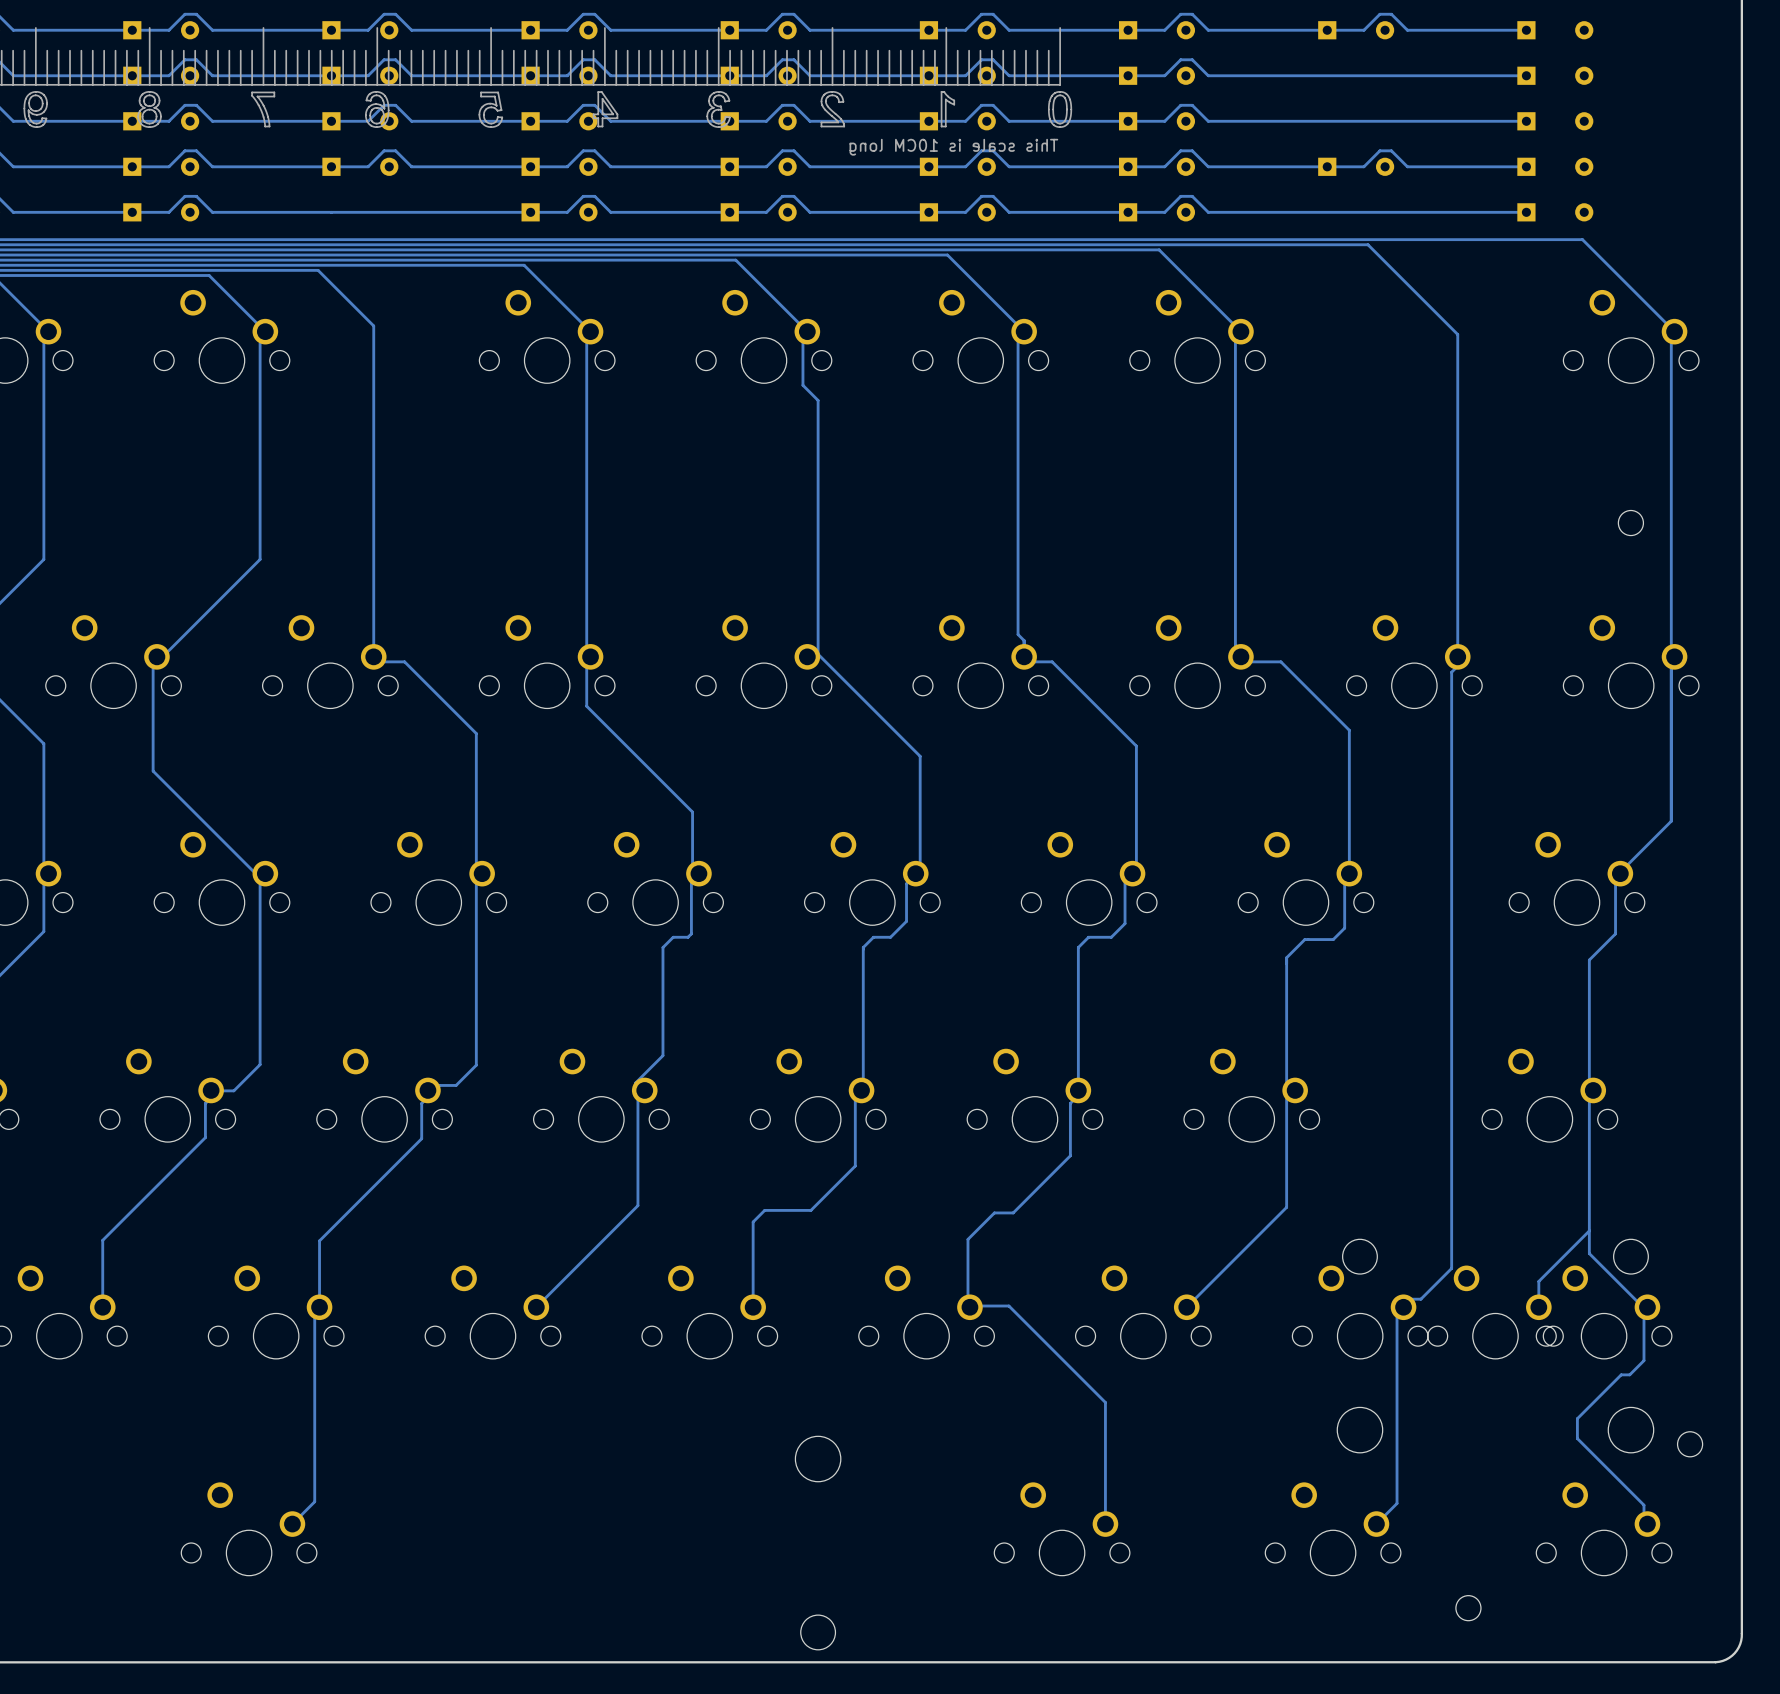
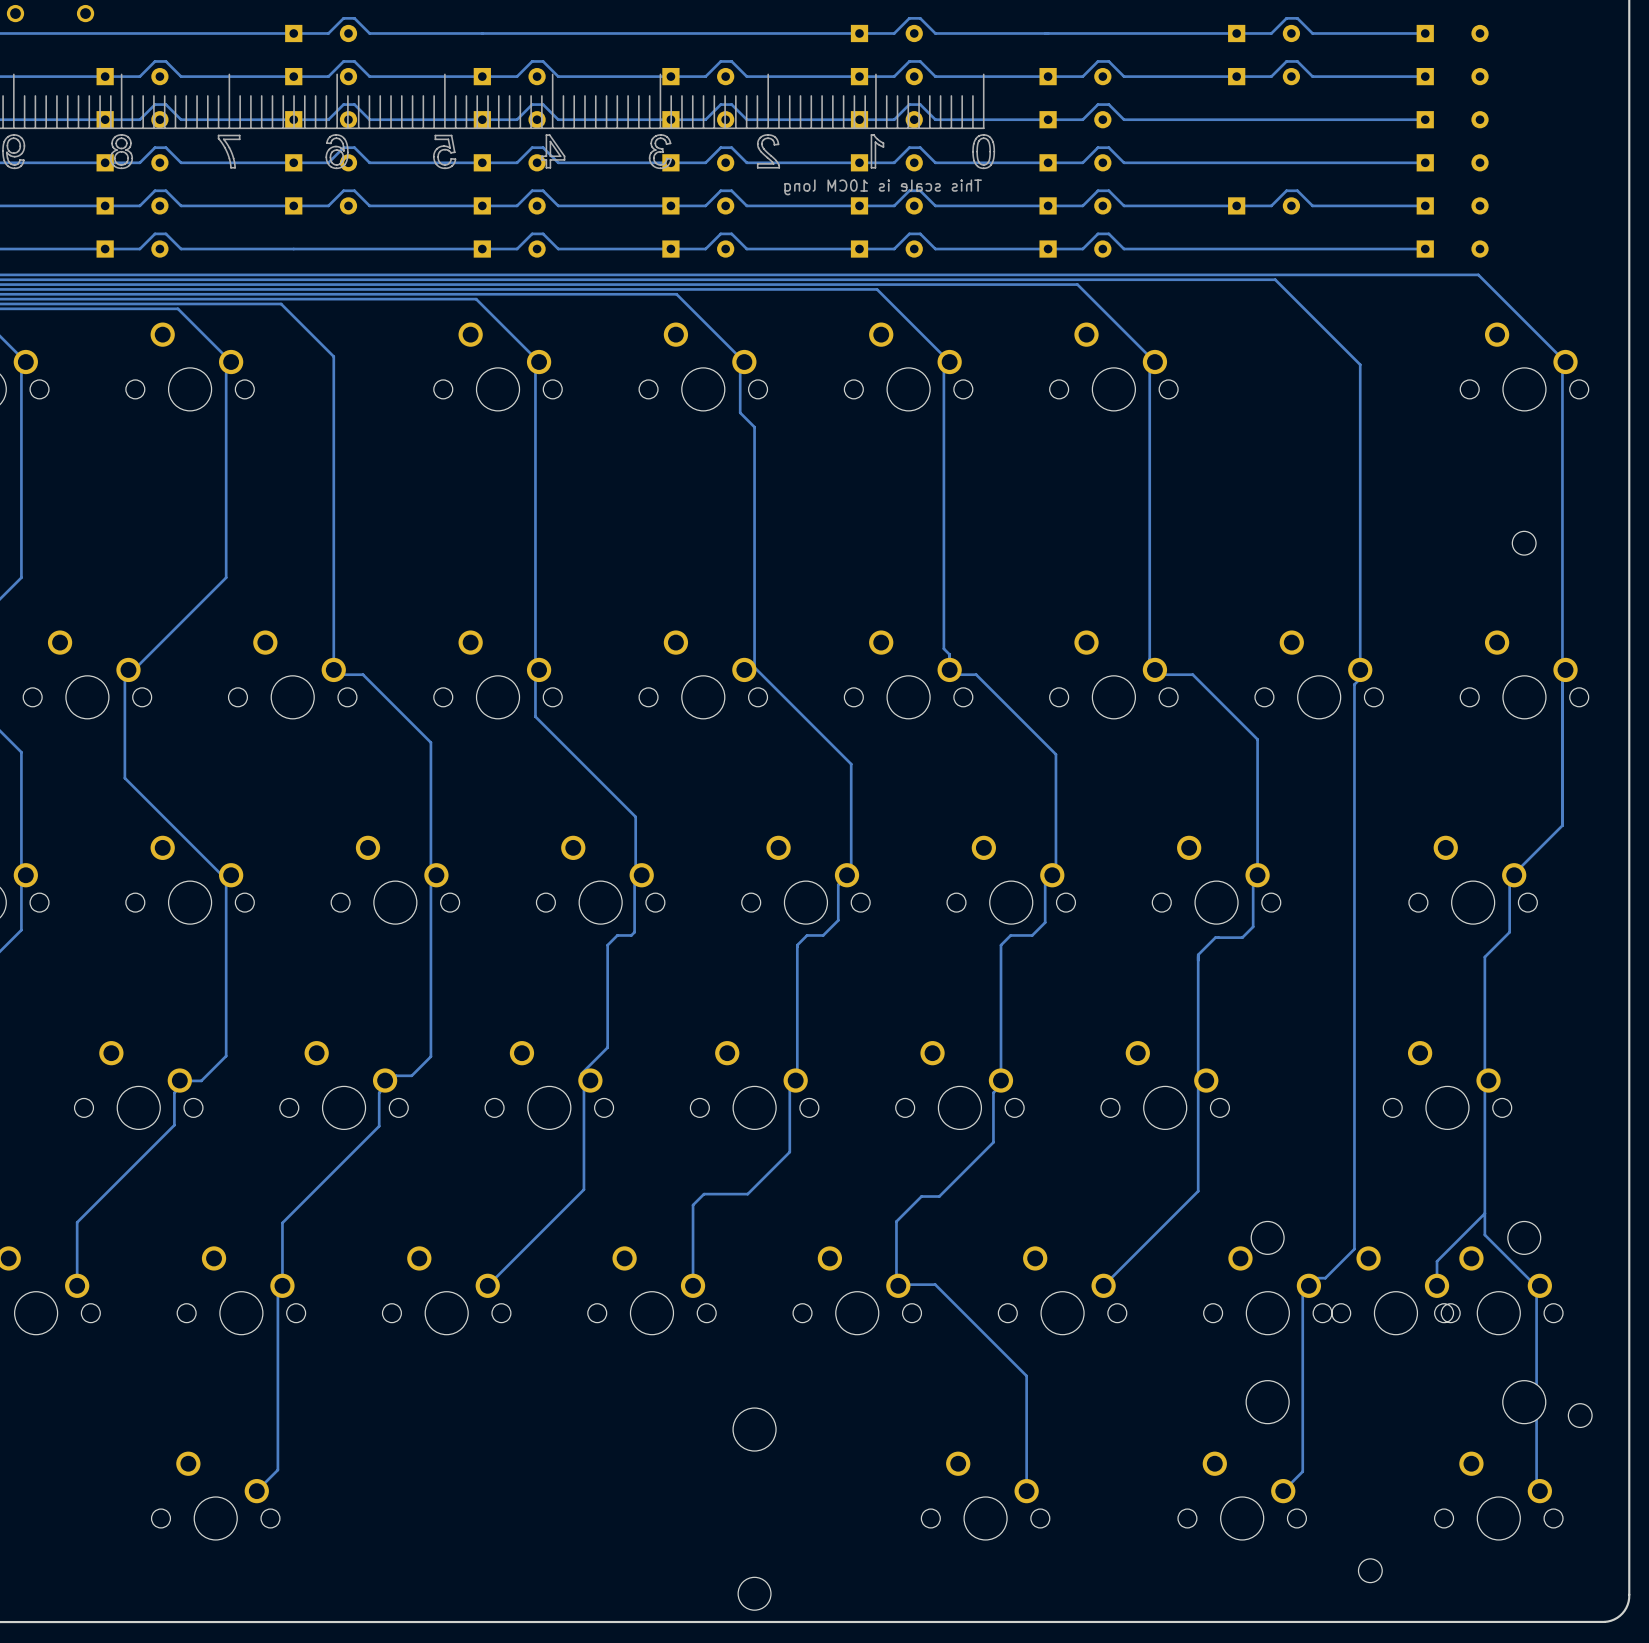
track: (1643, 1360) (1629, 1374) (1621, 1374) (1577, 1418) (1577, 1438) (1643, 1505) -> (1536, 1336) (1536, 1473)

